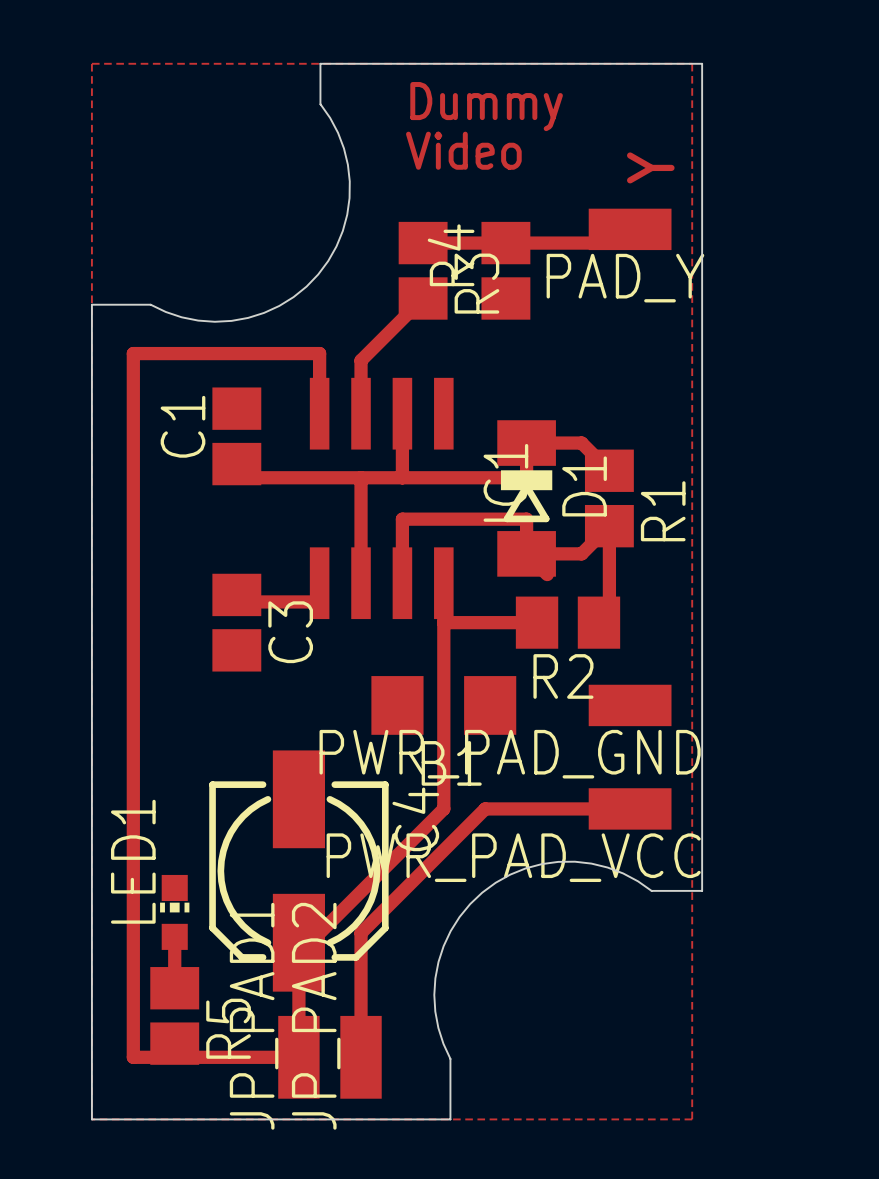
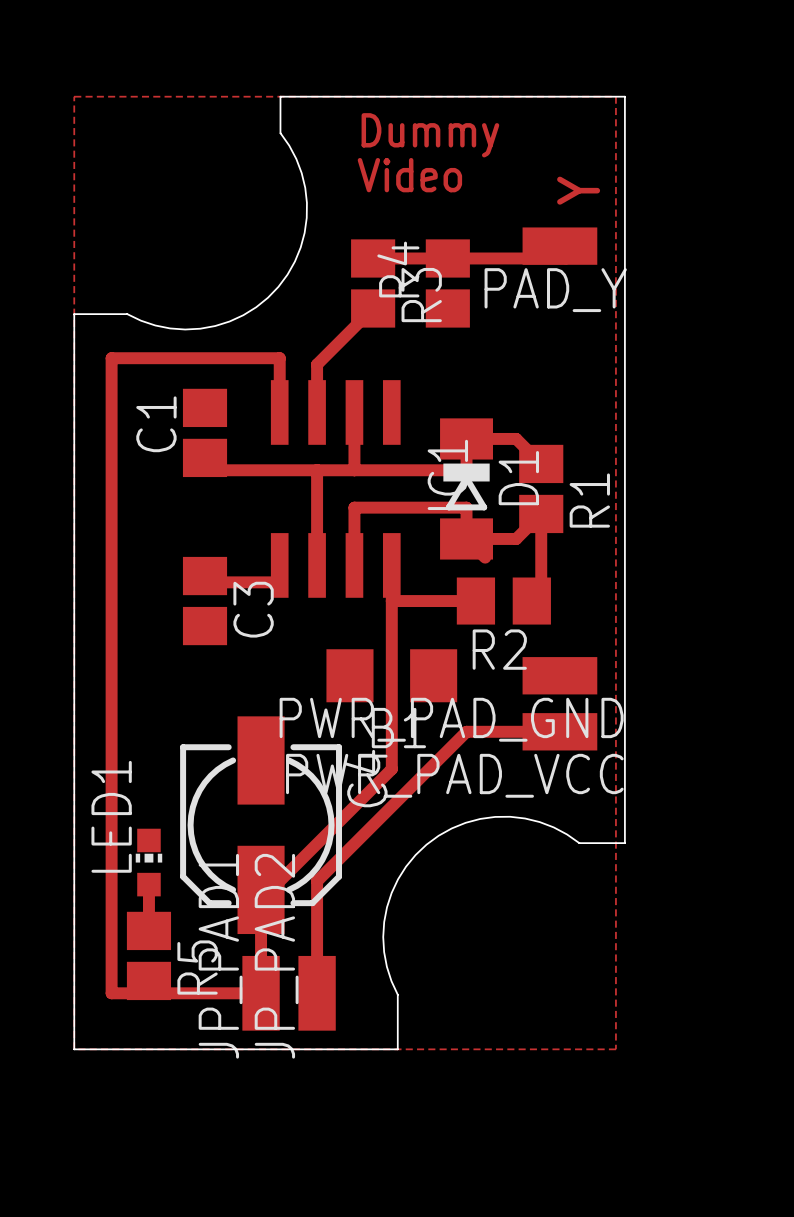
track: (485, 808) (630, 808) -> (429, 769) (466, 731) (559, 731)
PWR_PAD_VCC position: (630, 808) -> (559, 731)

